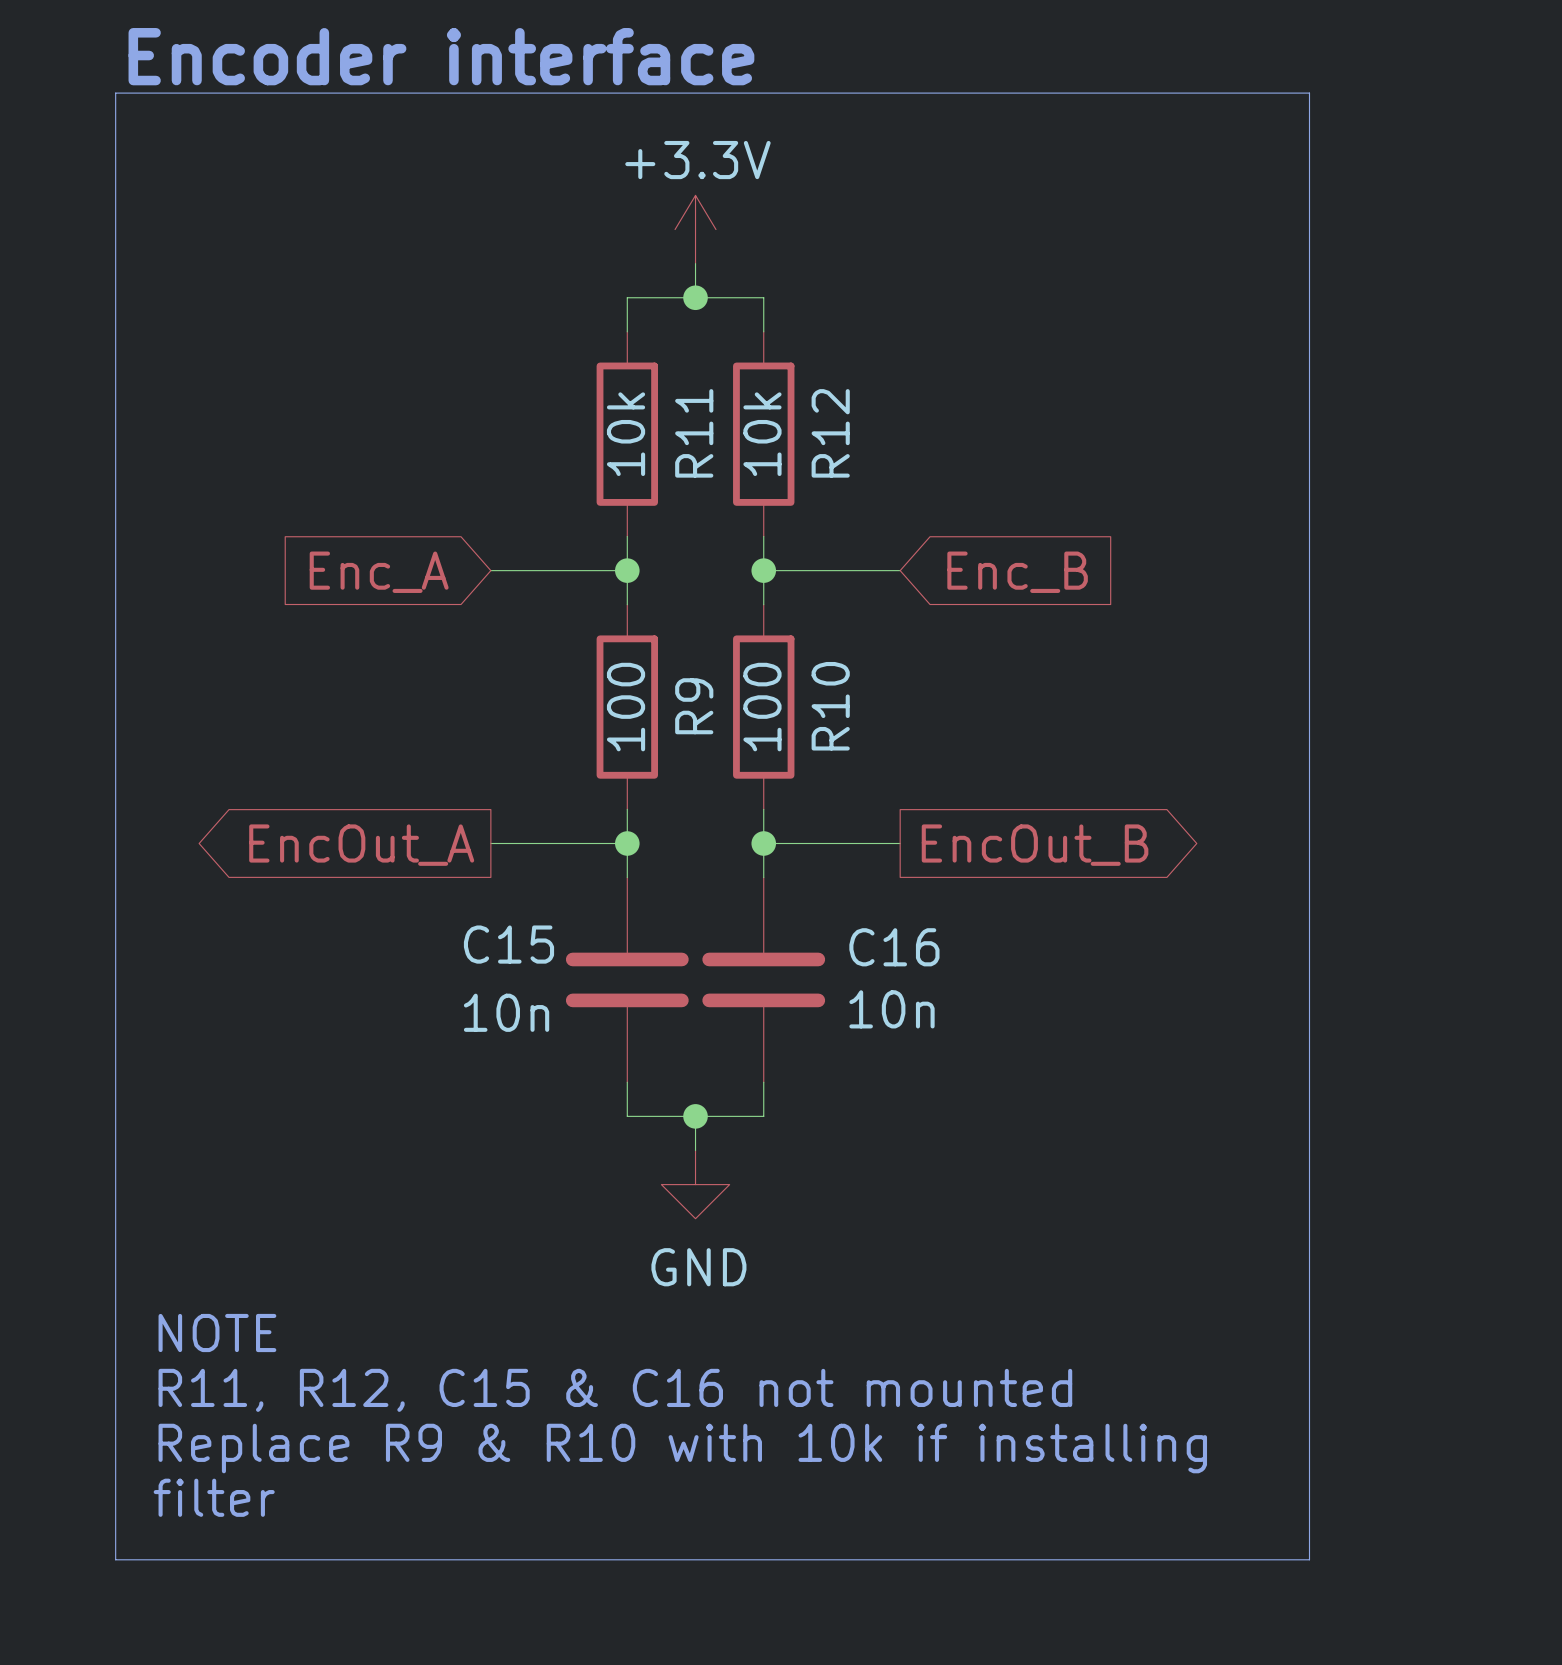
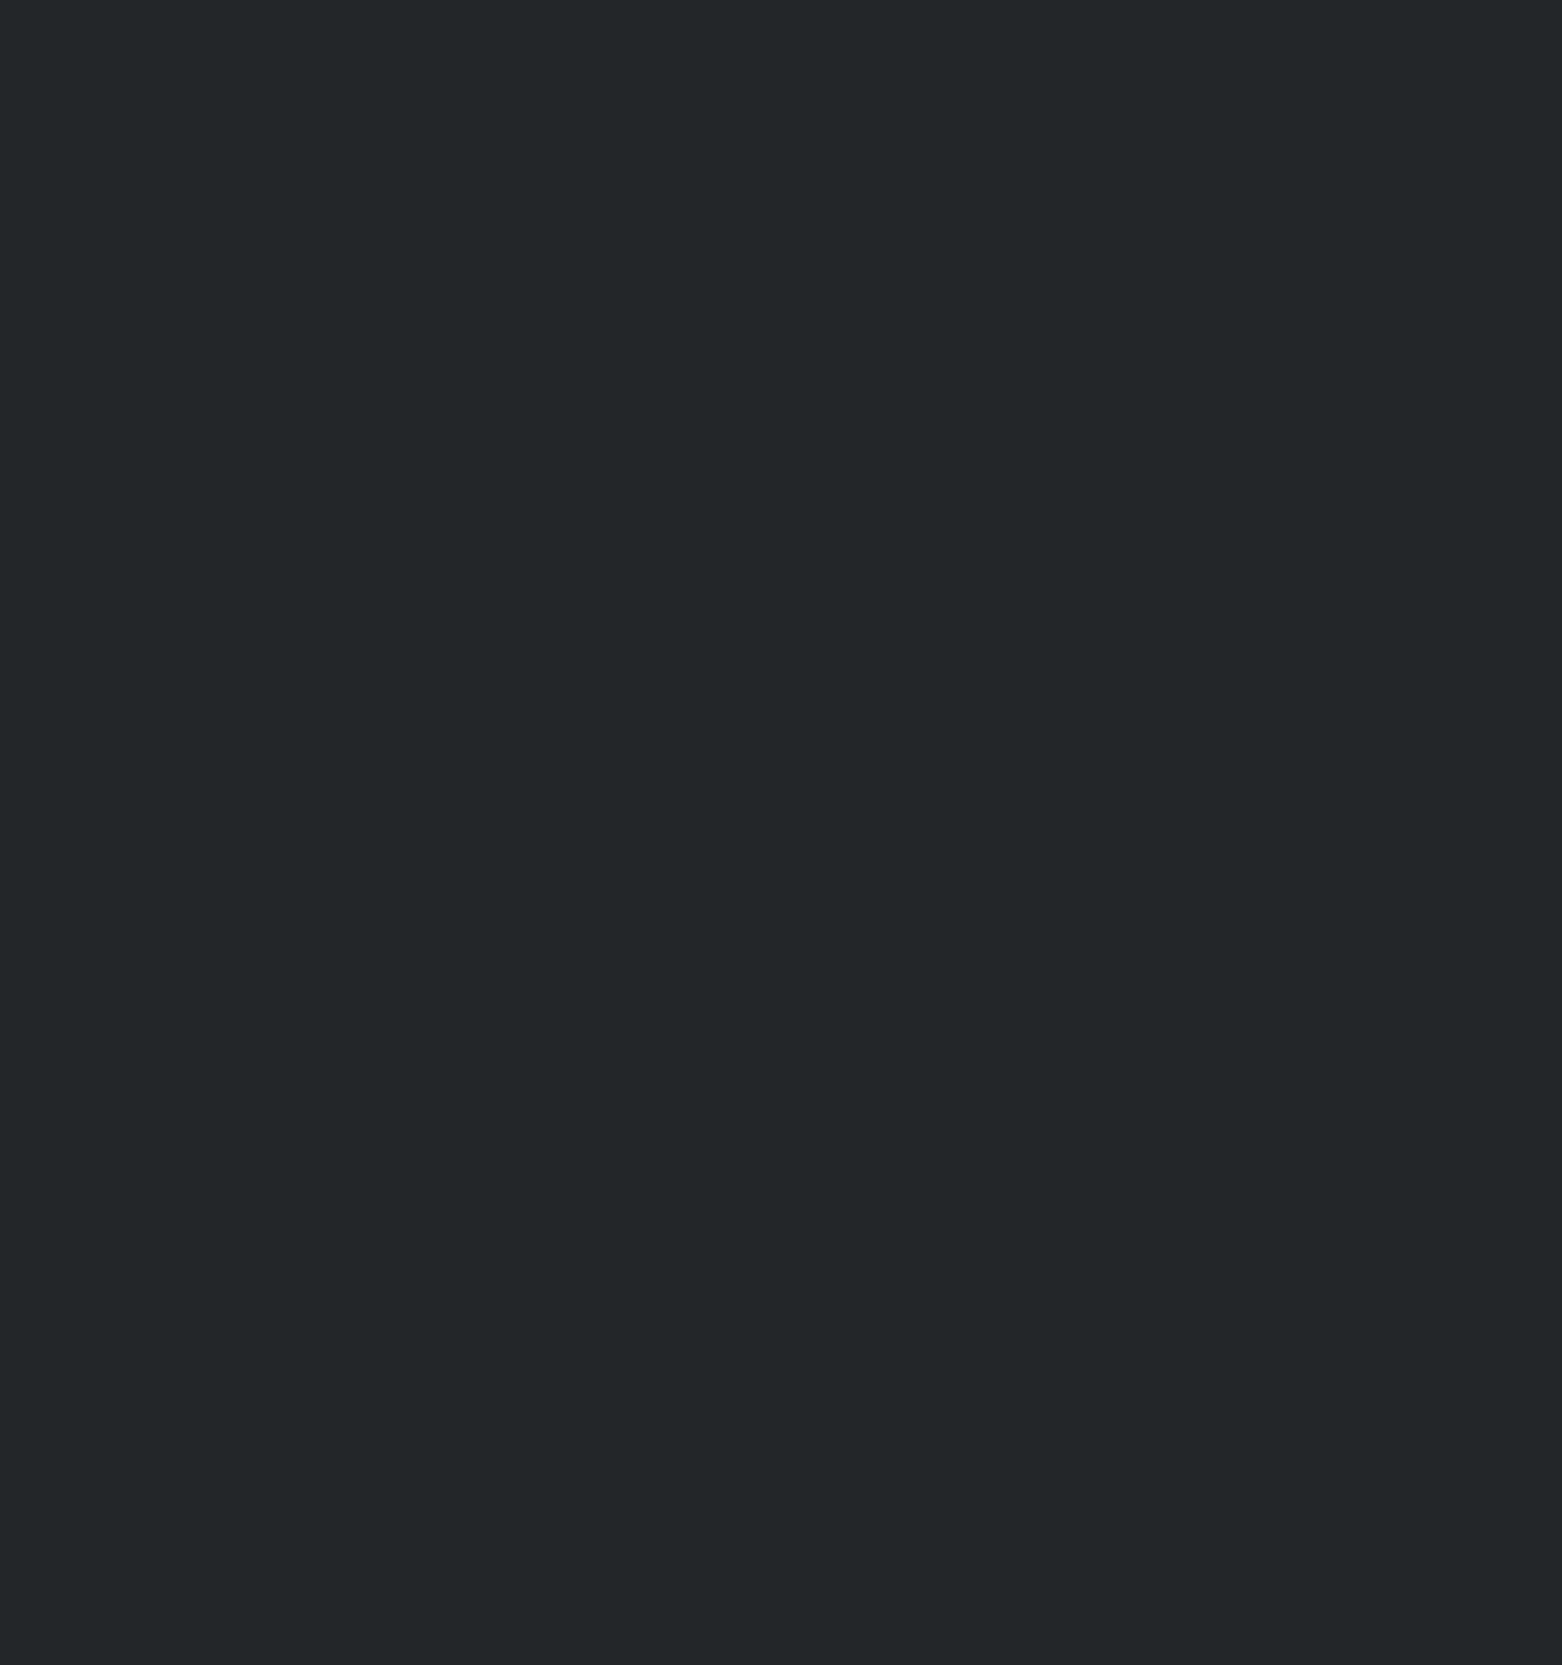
text: Encoder interface (441, 56) -> none
line: (115, 93) (1309, 93) (1309, 1559) (115, 1559) (115, 93) -> none
power symbol: +3.3V (695, 229) -> none
wire: (695, 263) (695, 297) -> none
junction: (695, 297) -> none
wire: (627, 331) (627, 297) (763, 297) (763, 331) -> none
R11: 10k (627, 434) -> none
R12: 10k (763, 434) -> none
wire: (627, 536) (627, 604) -> none
wire: (763, 536) (763, 604) -> none
wire: (490, 570) (627, 570) -> none
junction: (627, 570) -> none
wire: (763, 570) (900, 570) -> none
junction: (763, 570) -> none
global label: Enc_A (379, 572) -> none
global label: Enc_B (1017, 572) -> none
R9: 100 (627, 707) -> none
R10: 100 (763, 707) -> none
wire: (627, 809) (627, 877) -> none
wire: (763, 809) (763, 877) -> none
wire: (490, 843) (627, 843) -> none
junction: (627, 843) -> none
wire: (763, 843) (900, 843) -> none
junction: (763, 843) -> none
global label: EncOut_A (361, 845) -> none
global label: EncOut_B (1035, 845) -> none
C15: 10n (627, 979) -> none
C16: 10n (763, 979) -> none
wire: (627, 1082) (627, 1116) (763, 1116) (763, 1082) -> none
wire: (695, 1116) (695, 1150) -> none
junction: (695, 1116) -> none
power symbol: GND (695, 1184) -> none
text: NOTE (217, 1333) -> none
text: R11, R12, C15 & C16 not mounted (615, 1390) -> none
text: Replace R9 & R10 with 10k if installing (682, 1448) -> none
text: filter (214, 1497) -> none

